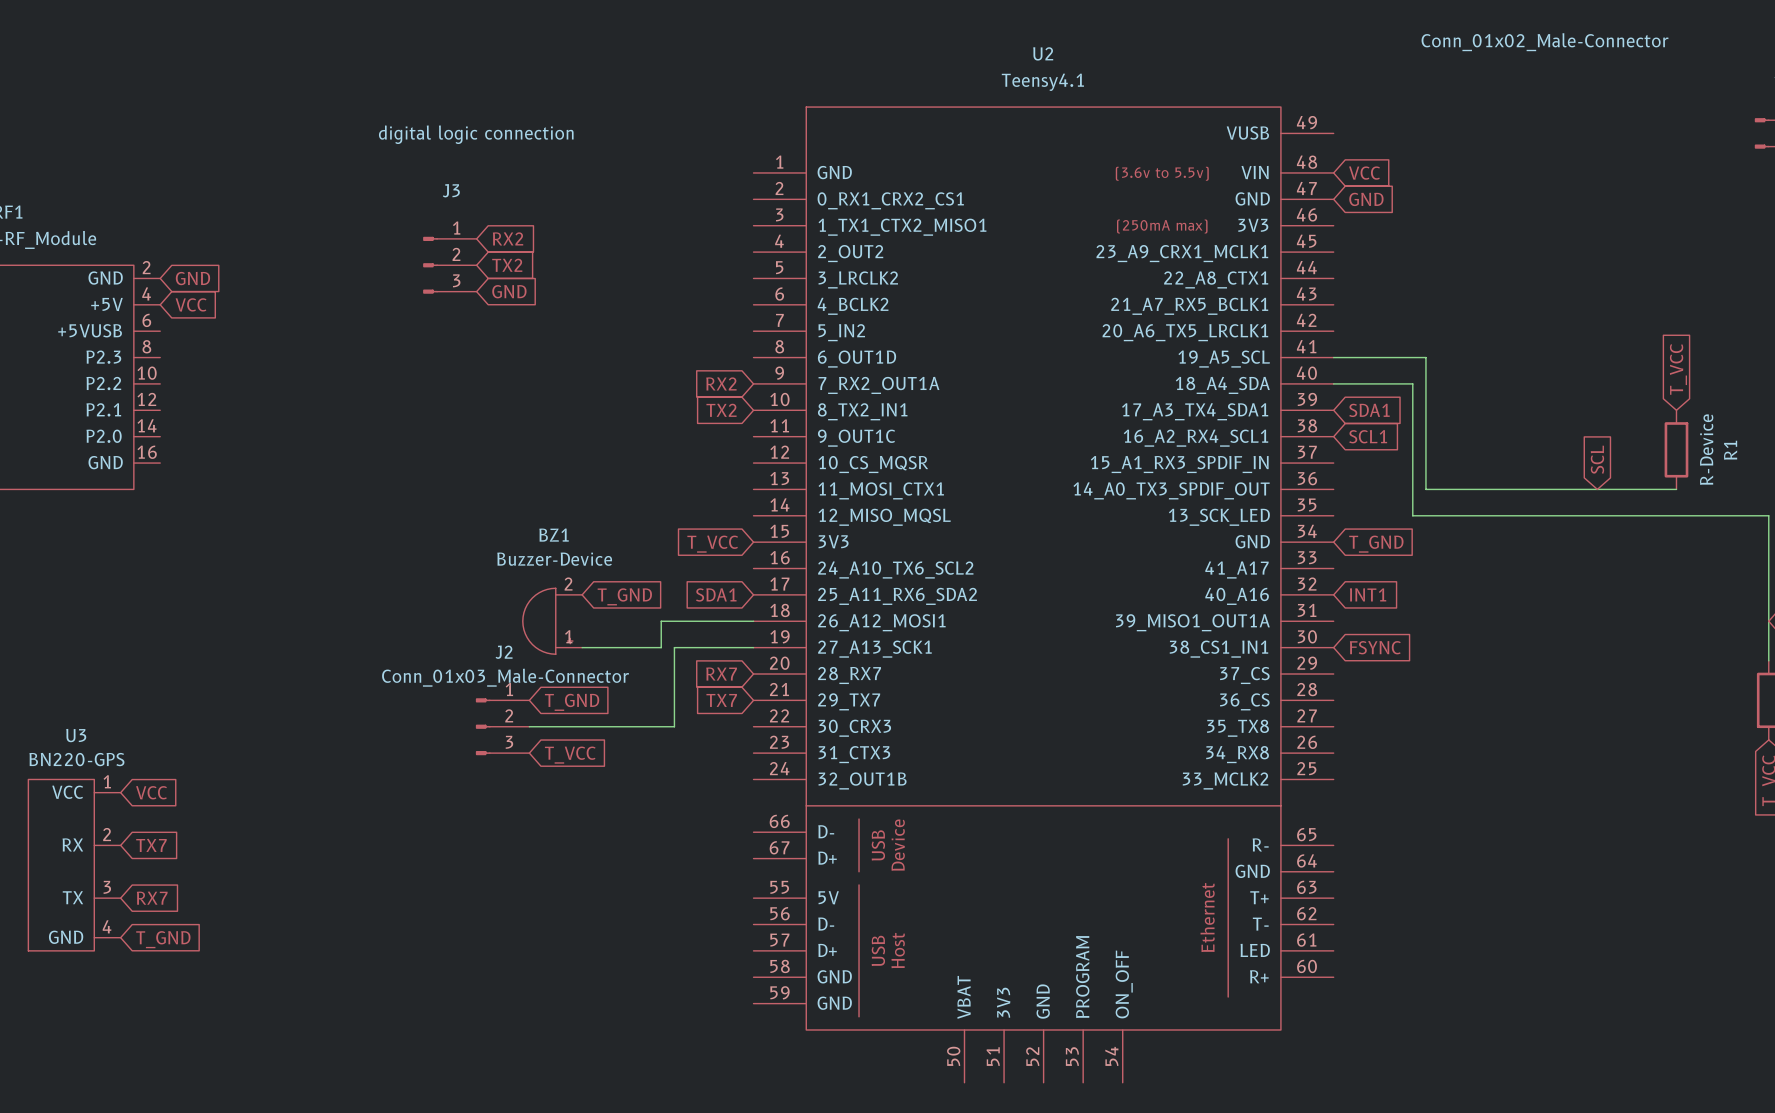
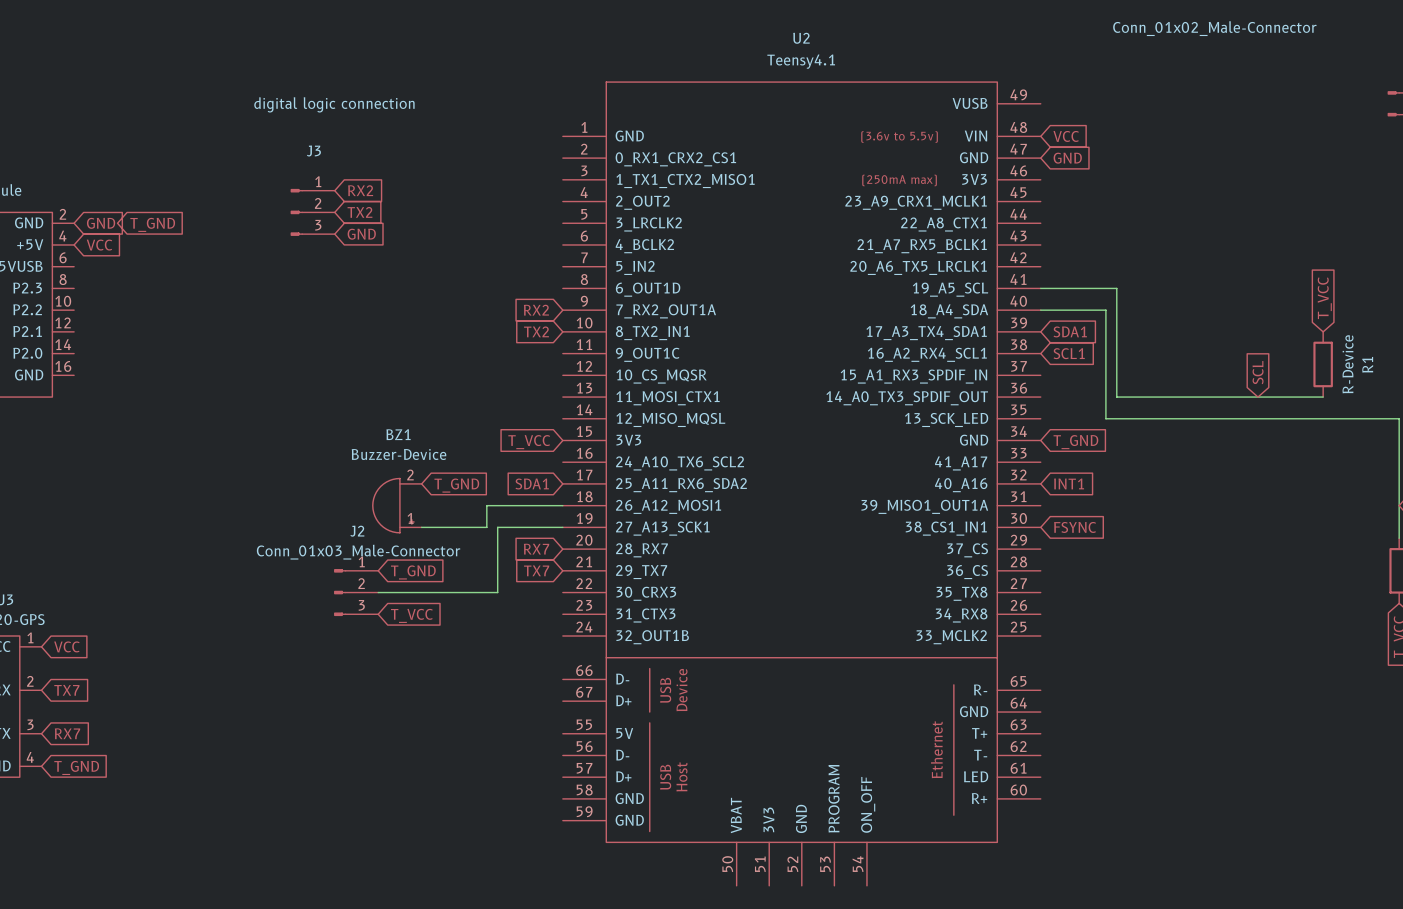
global label: none -> T_GND (152, 224)

